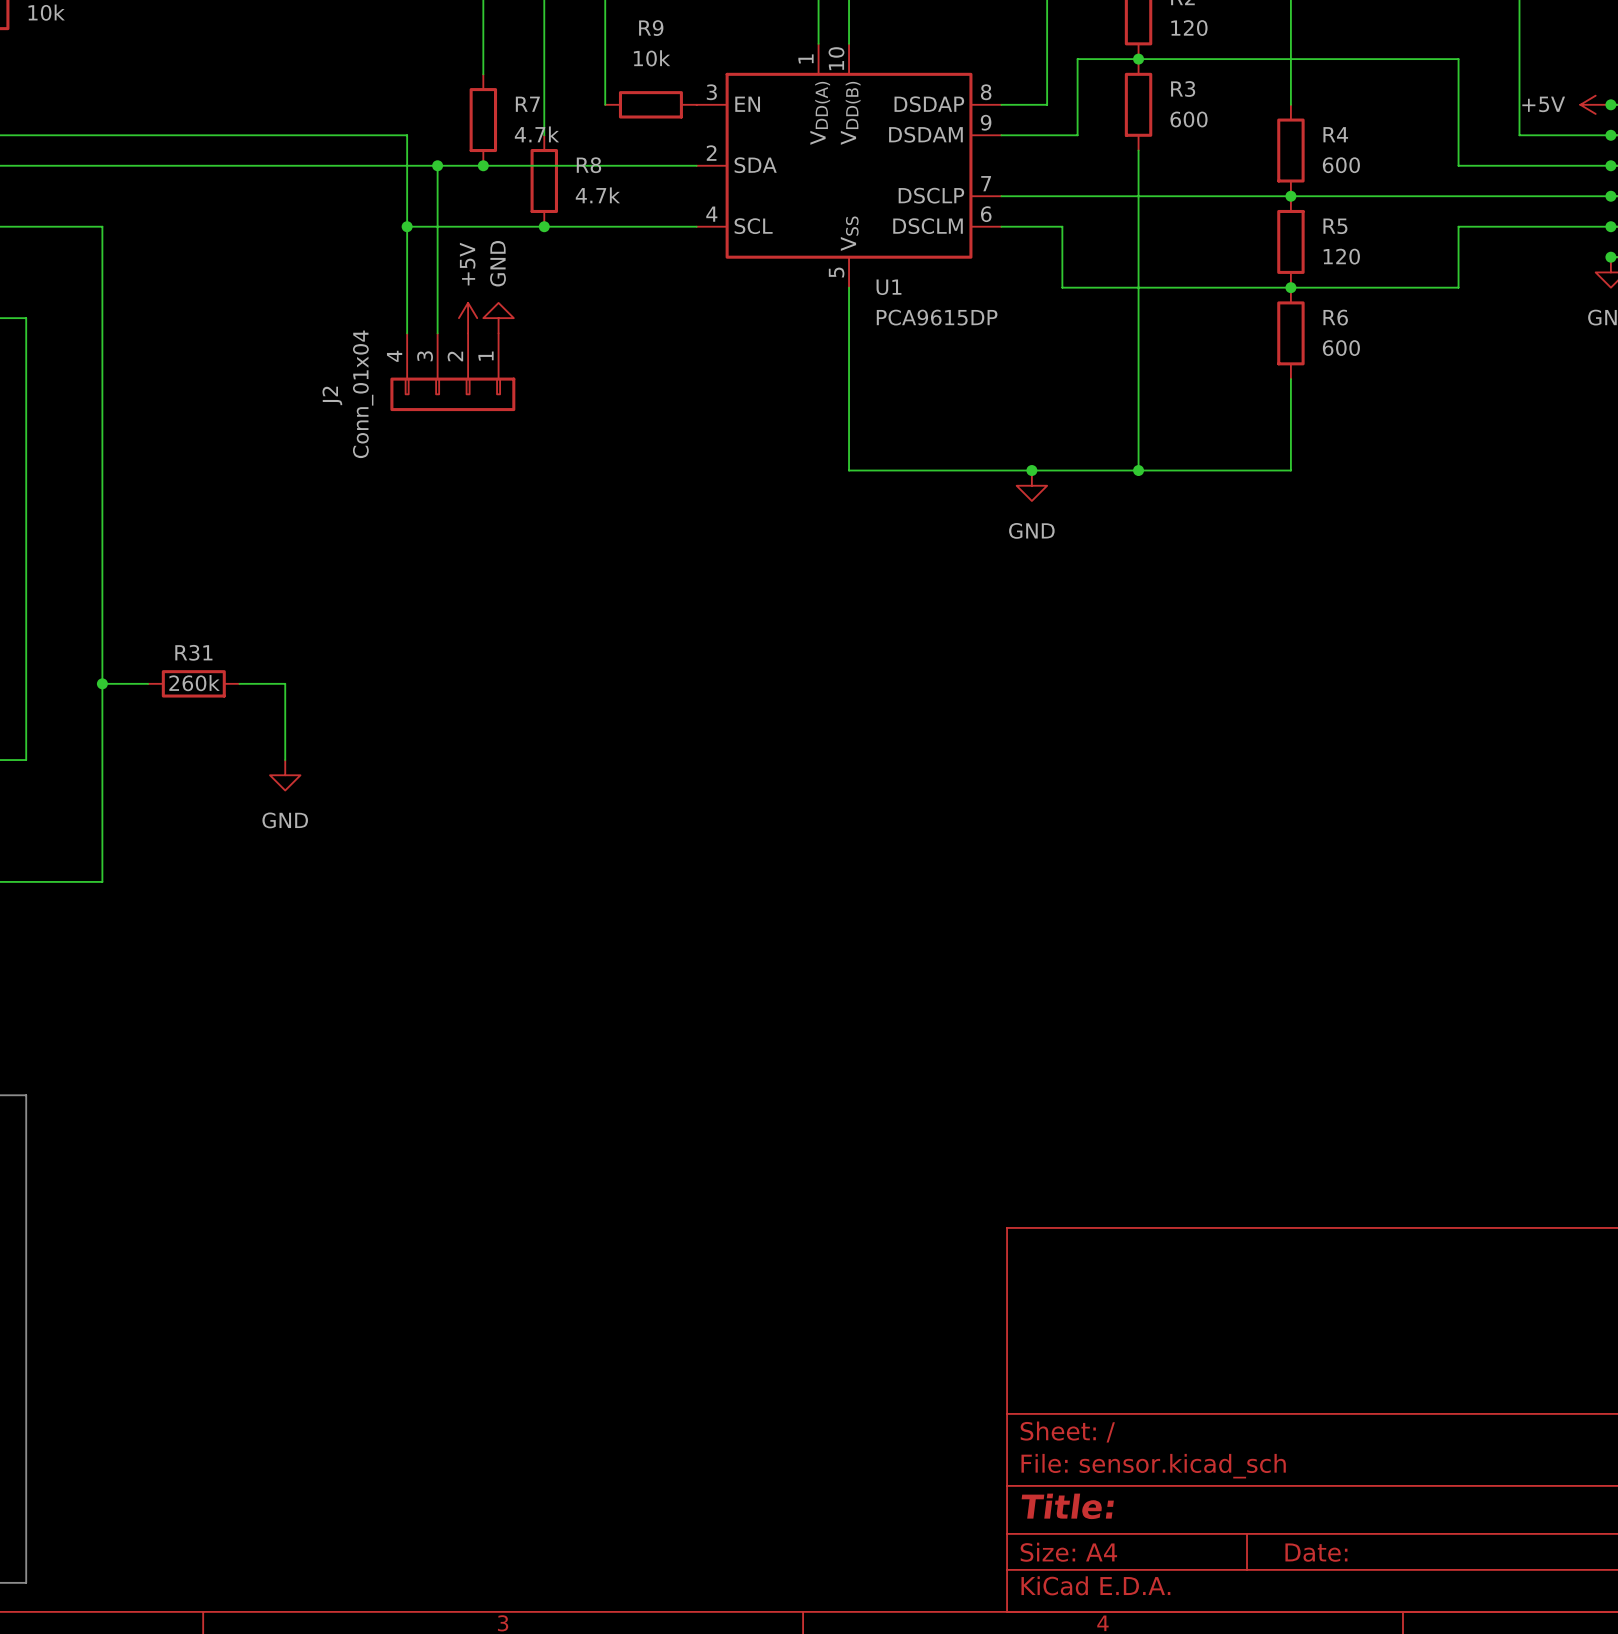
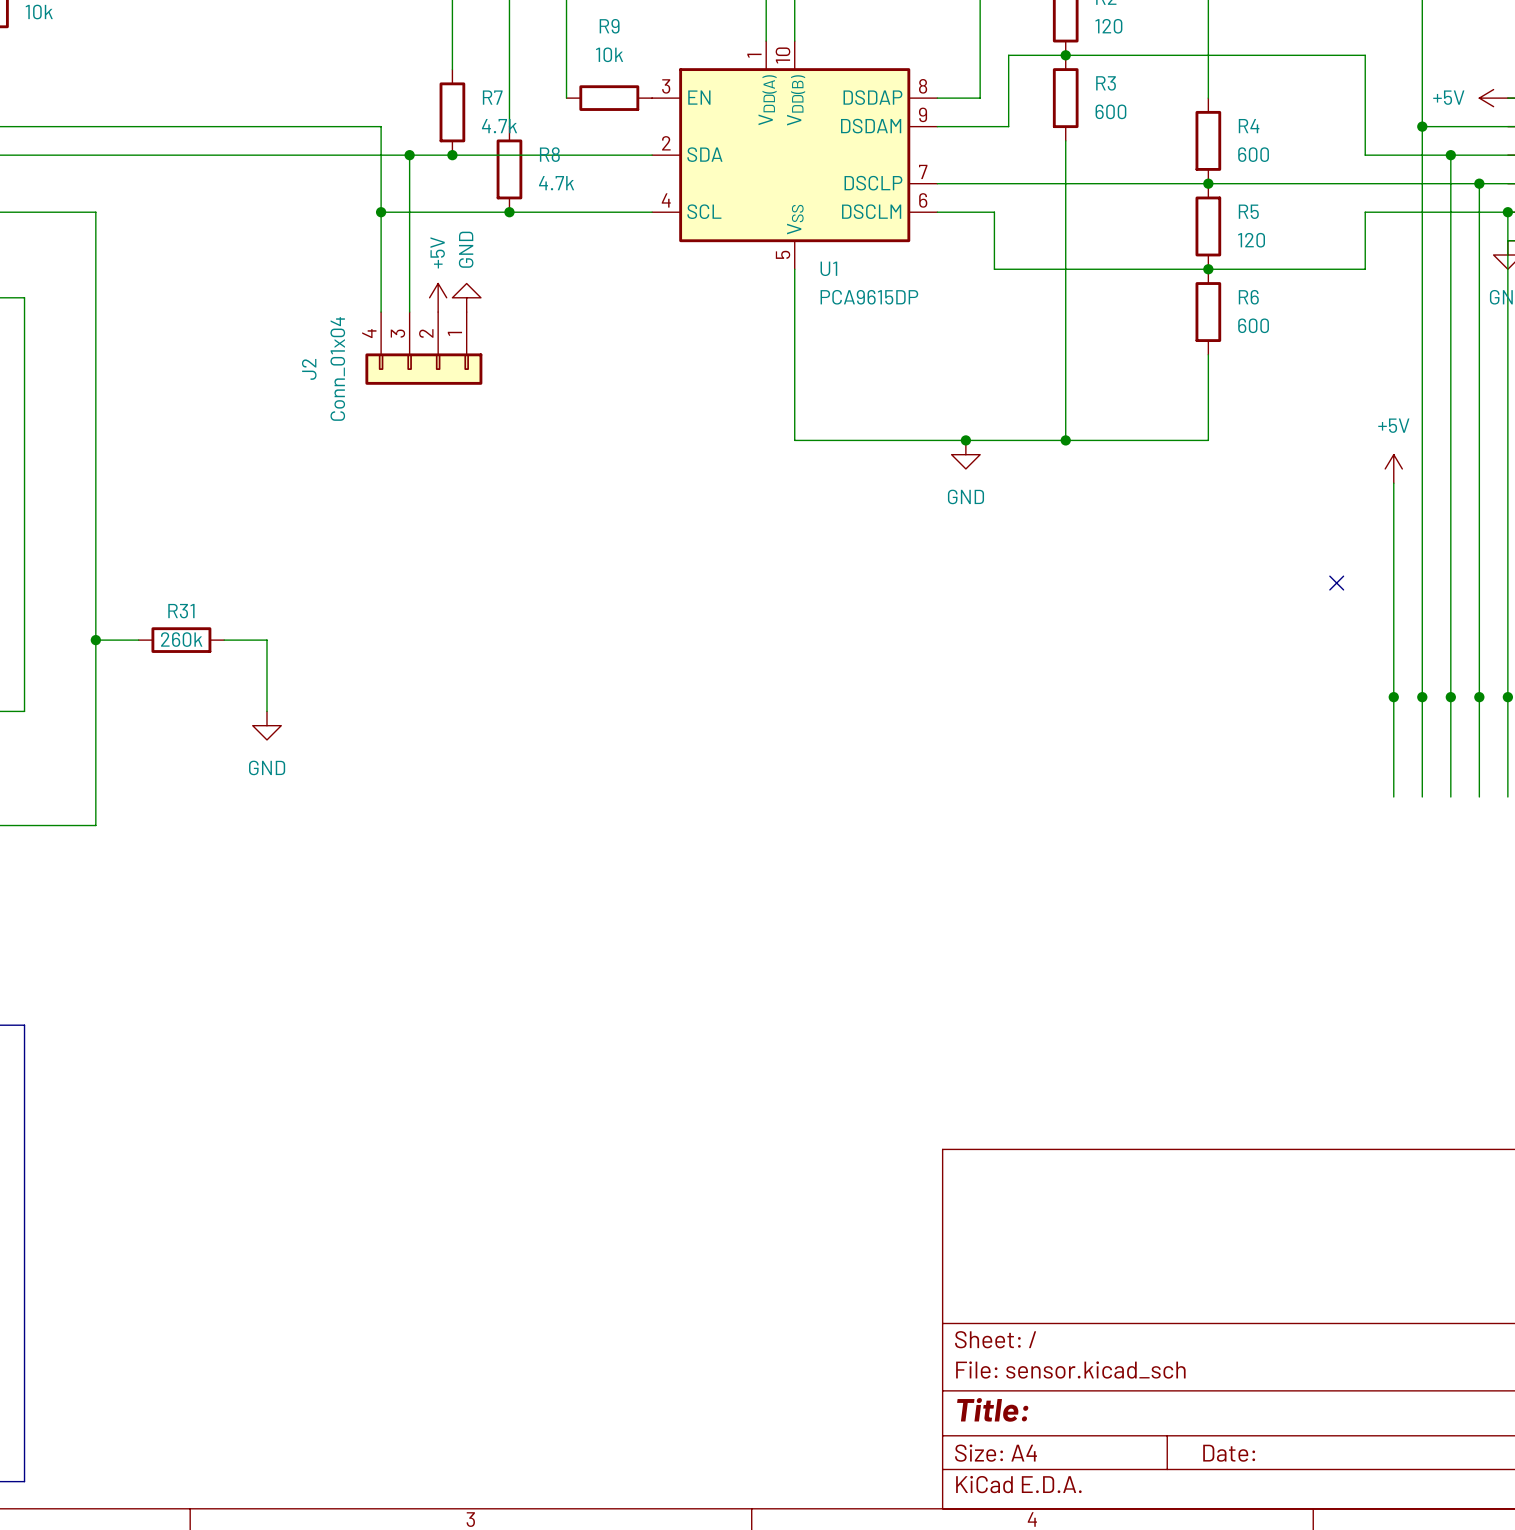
junction: (1610, 104) -> none
wire: none -> (1422, 126) (1422, 796)
junction: none -> (1422, 126)
junction: (1610, 135) -> none
wire: none -> (1450, 155) (1450, 796)
junction: none -> (1450, 155)
junction: (1610, 165) -> none
wire: none -> (1479, 183) (1479, 796)
junction: none -> (1479, 183)
junction: (1610, 196) -> none
wire: none -> (1507, 212) (1507, 796)
junction: (1610, 257) -> none
power symbol: none -> +5V (1393, 468)
wire: none -> (1393, 483) (1393, 796)
no-connect mark: none -> (1336, 583)
junction: none -> (1393, 697)
junction: none -> (1422, 697)
junction: none -> (1450, 697)
junction: none -> (1479, 697)
junction: none -> (1507, 697)

